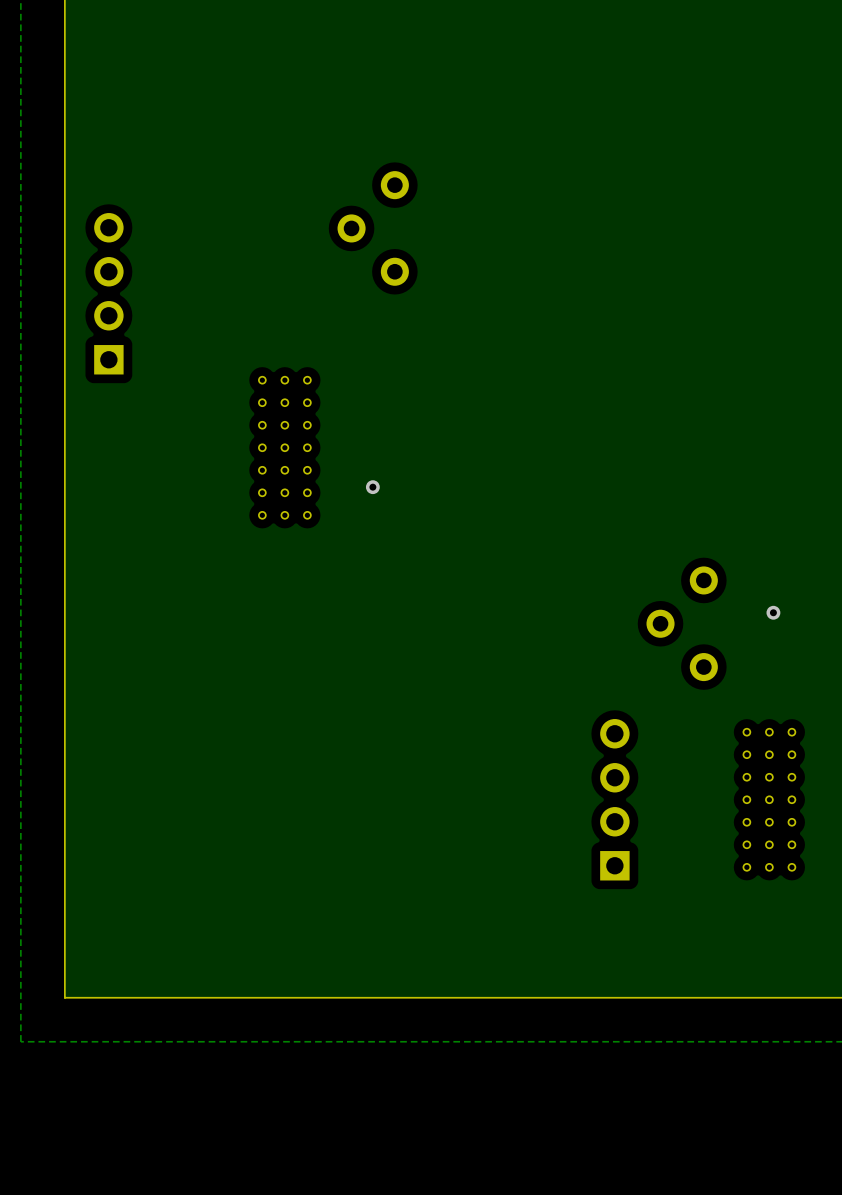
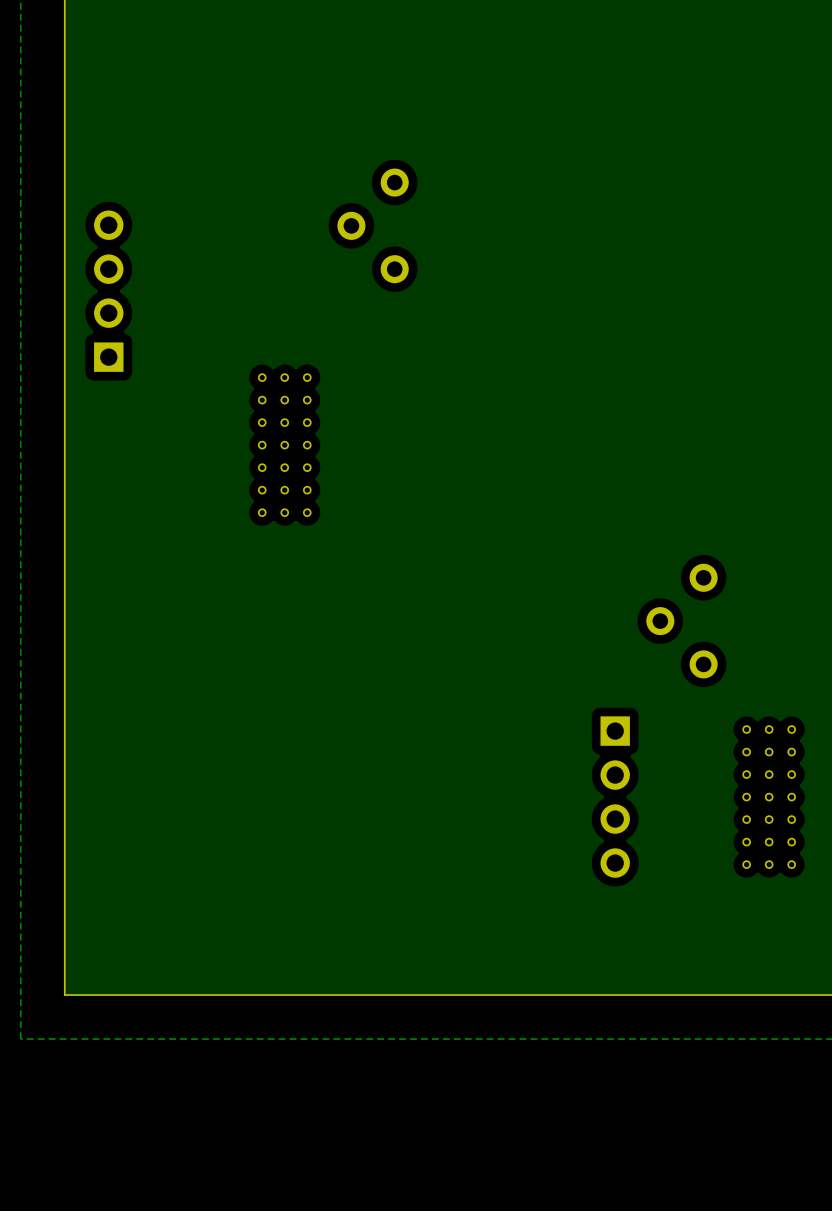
via: (372, 487) -> none
via: (773, 612) -> none
part rotation: 0° (614, 799) -> 180° (615, 797)

